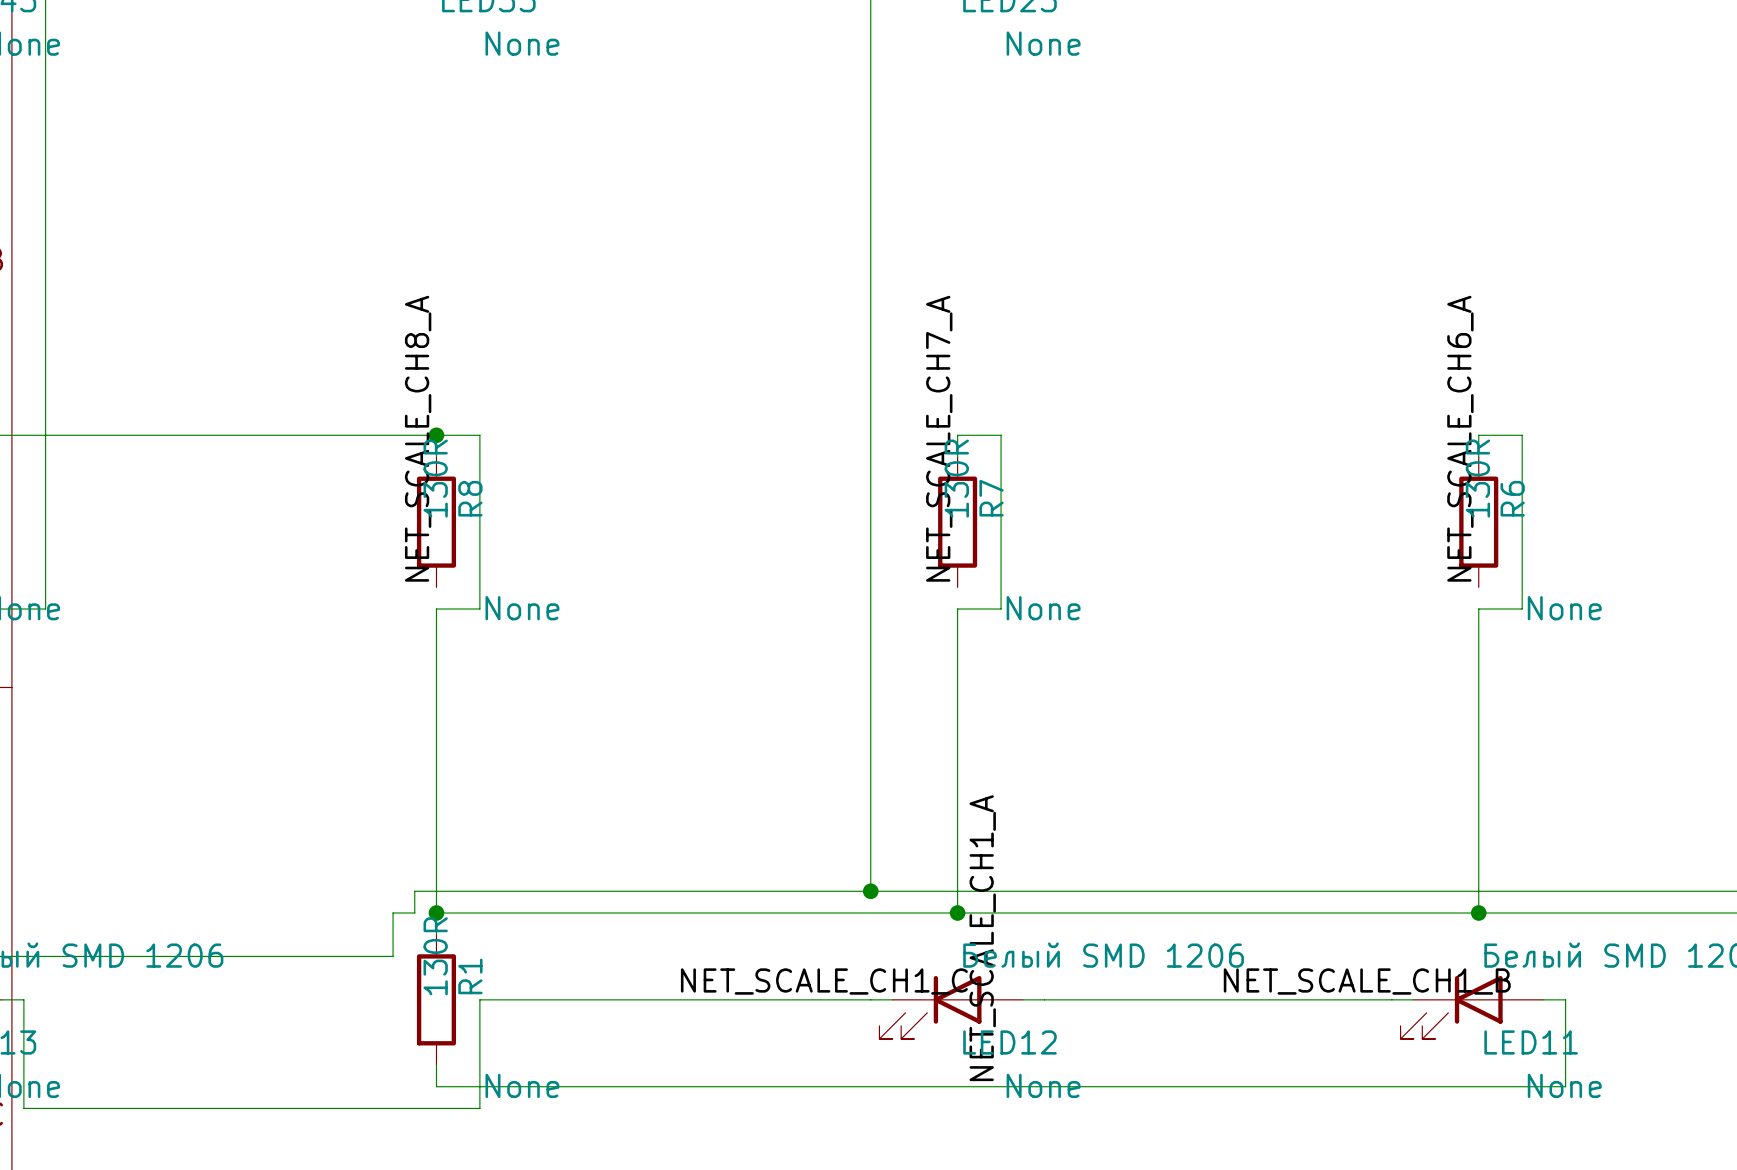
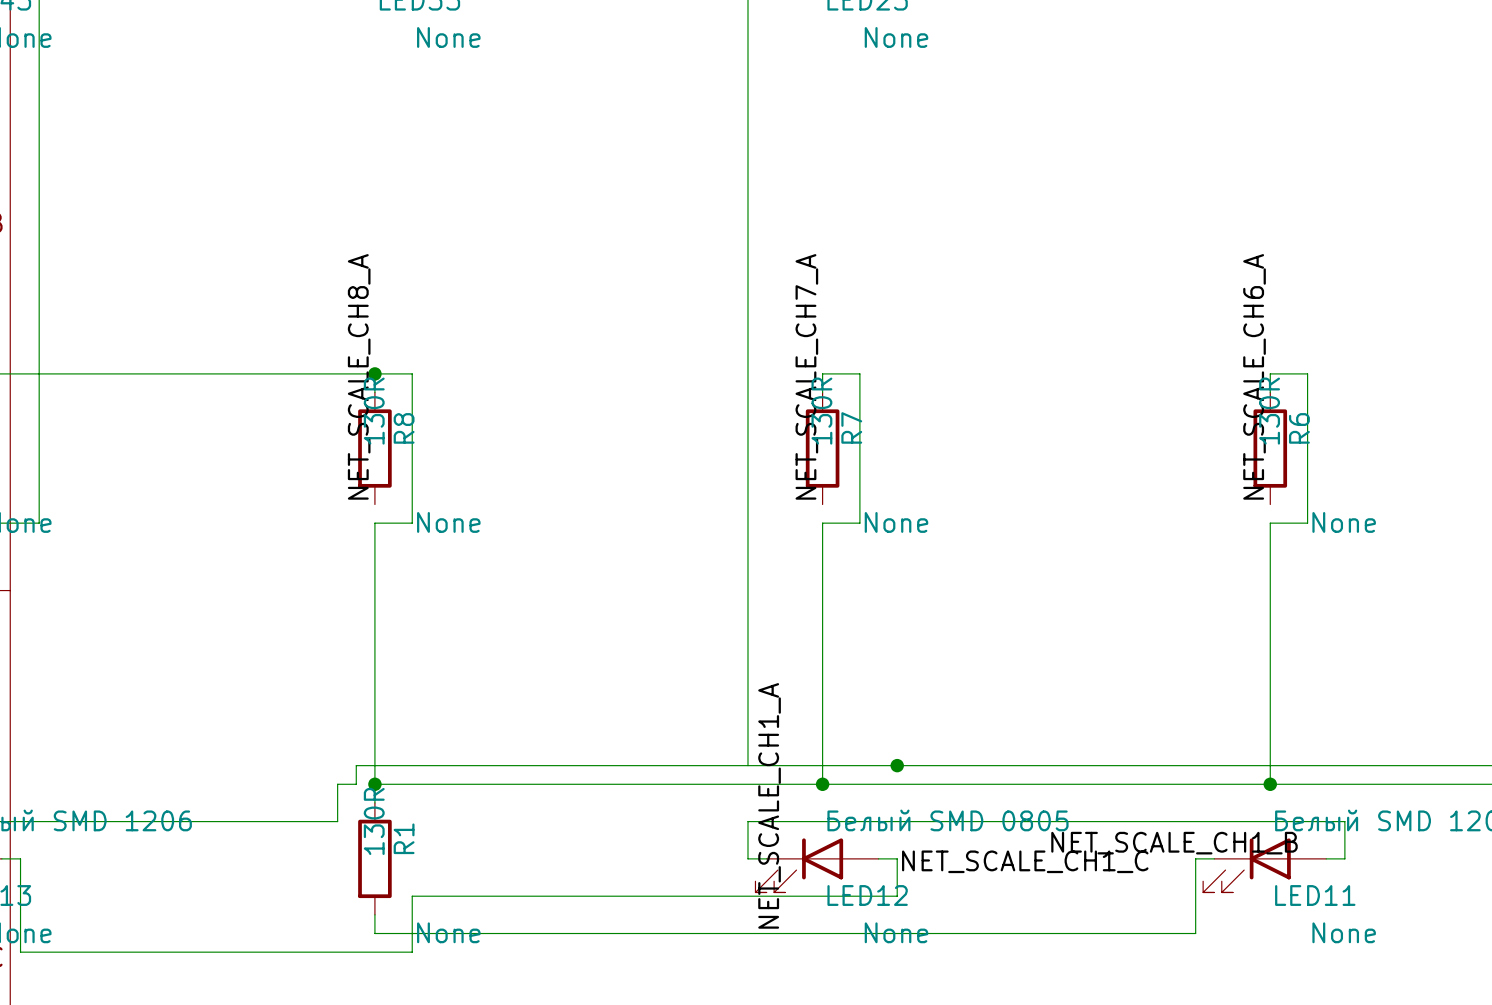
junction: (870, 891) -> none
junction: none -> (897, 765)
label position: NET_SCALE_CH1_A (982, 938) -> NET_SCALE_CH1_A (769, 805)
LED12 value: Белый SMD 1206 (1103, 955) -> Белый SMD 0805 (947, 820)
label position: NET_SCALE_CH1_C (824, 981) -> NET_SCALE_CH1_C (1025, 861)
wire: (870, 999) (479, 999) (479, 1043) -> (897, 858) (897, 896) (412, 896)
wire: none -> (747, 858) (747, 821) (1344, 821) (1344, 858)
wire: (1044, 999) (1391, 999) -> none
wire: (1565, 999) (1565, 1086) (1391, 1086) -> (1195, 858) (1195, 933)

